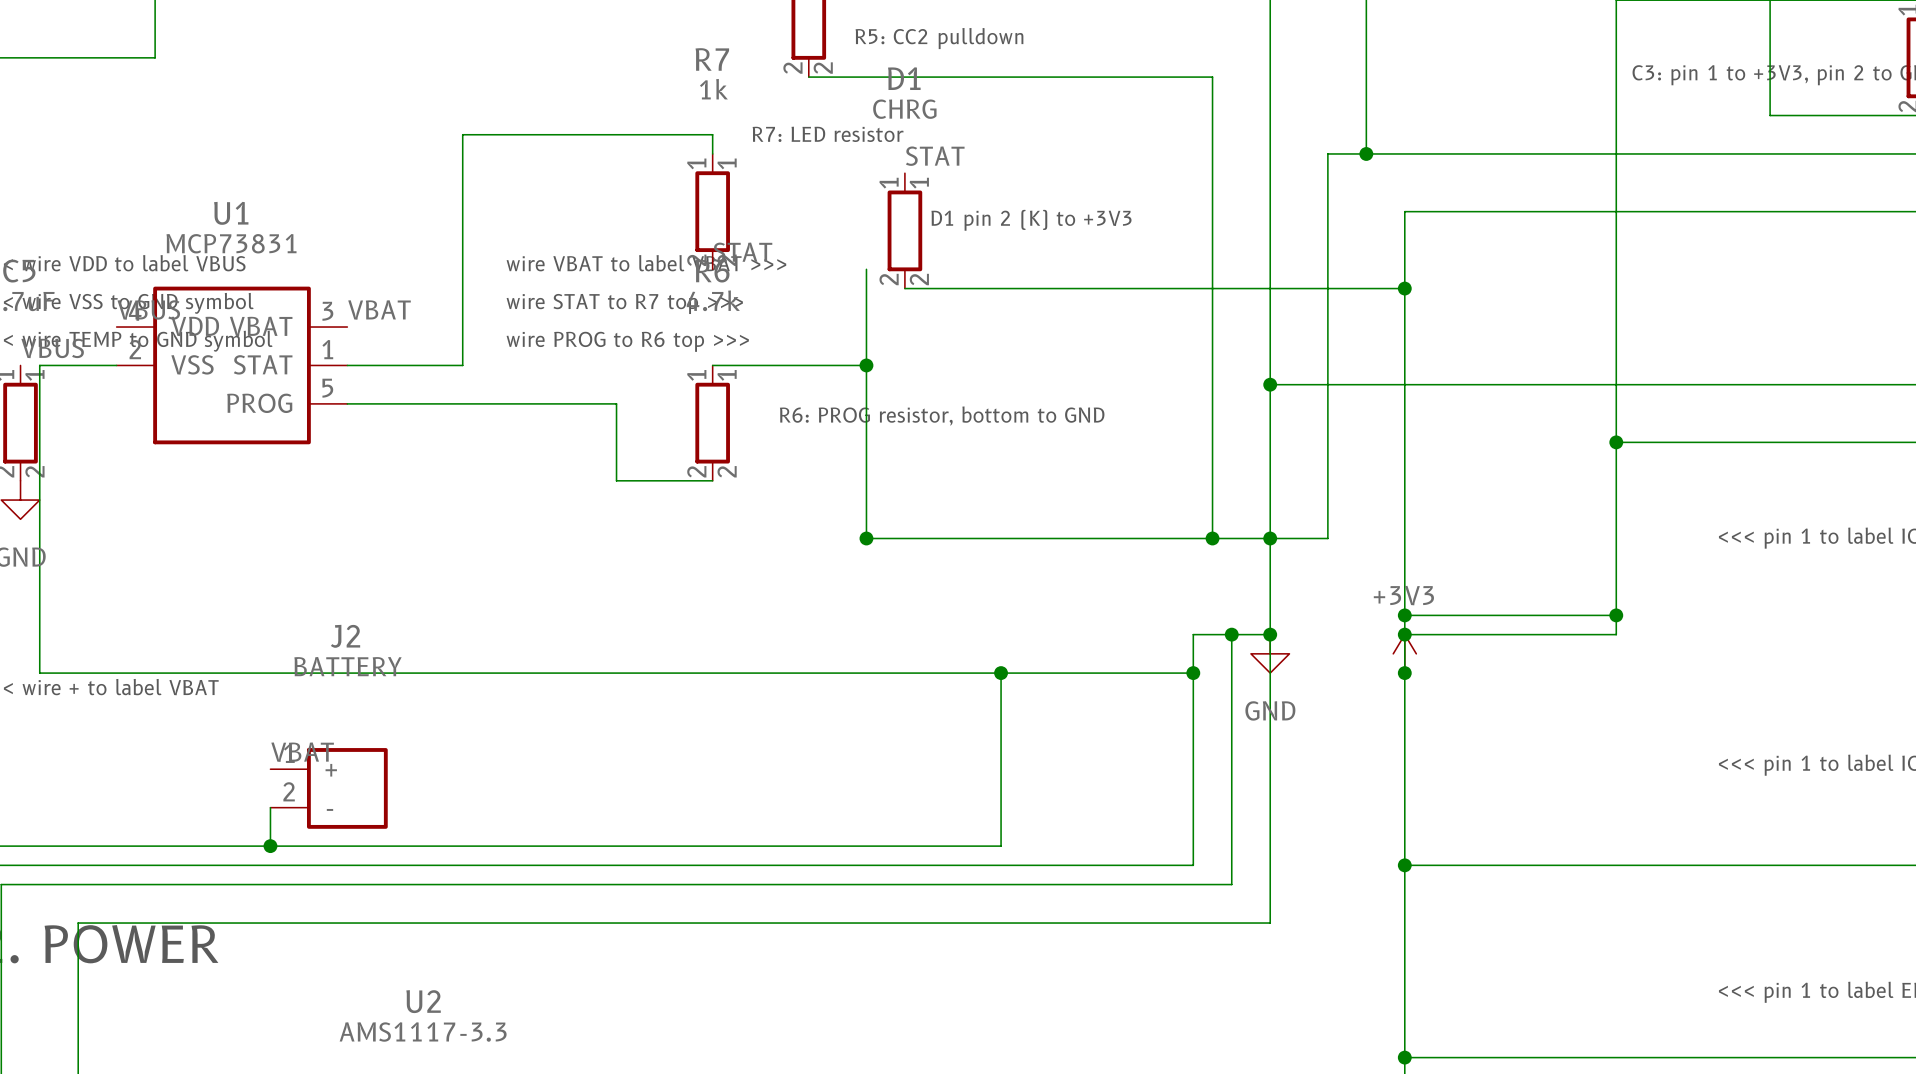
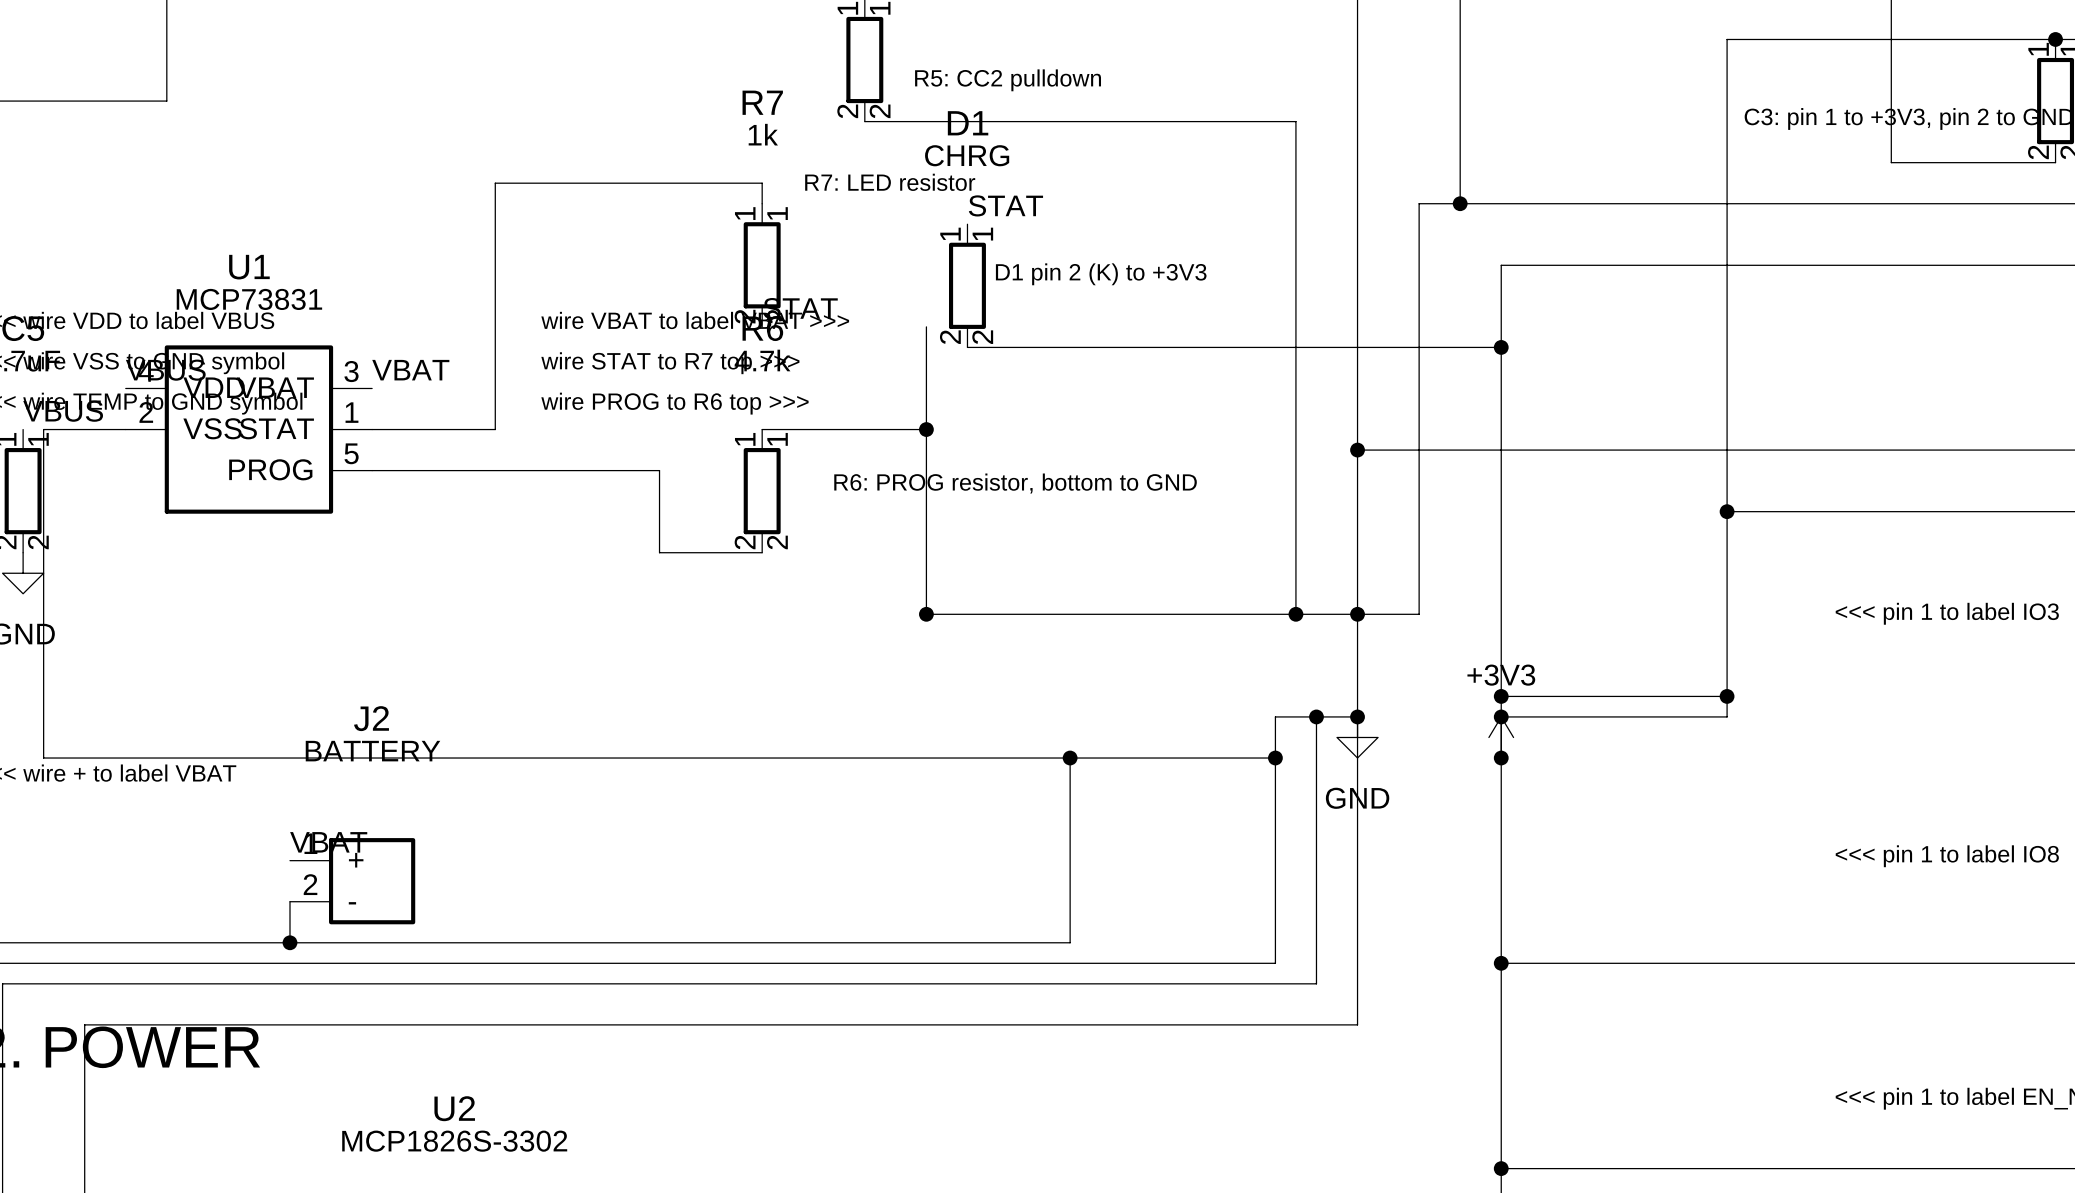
U2 value: AMS1117-3.3 (423, 1032) -> MCP1826S-3302 (454, 1141)

